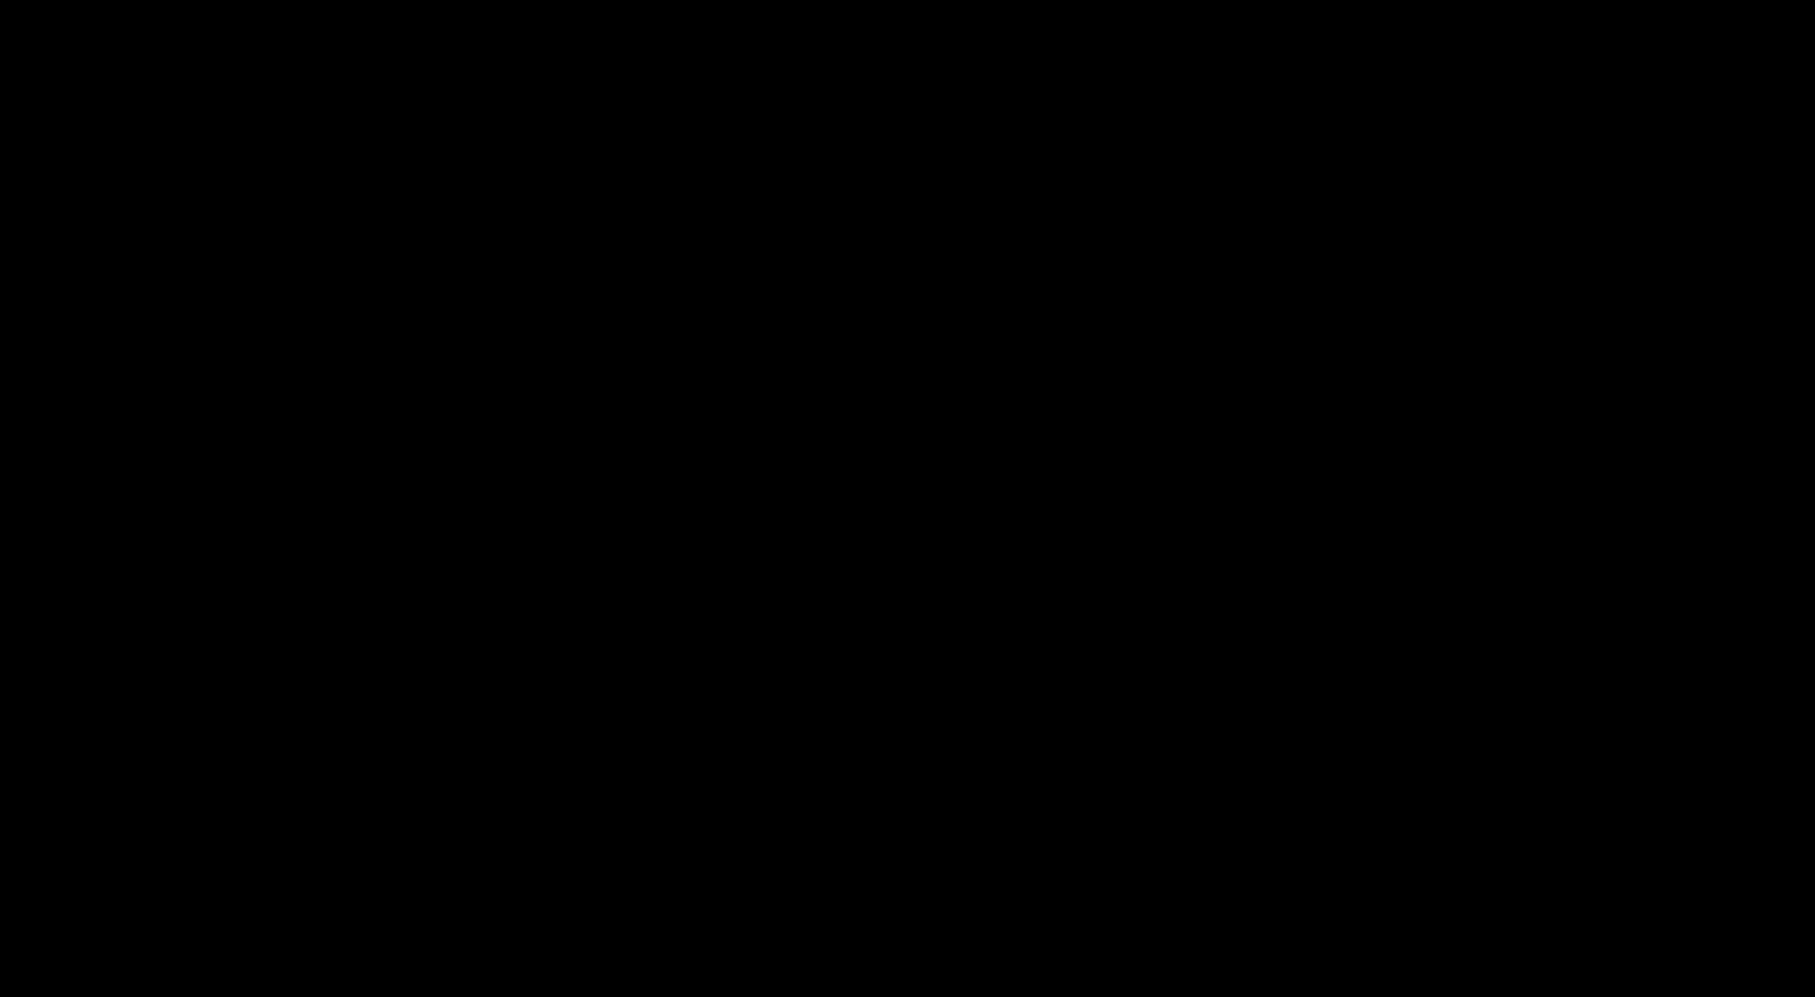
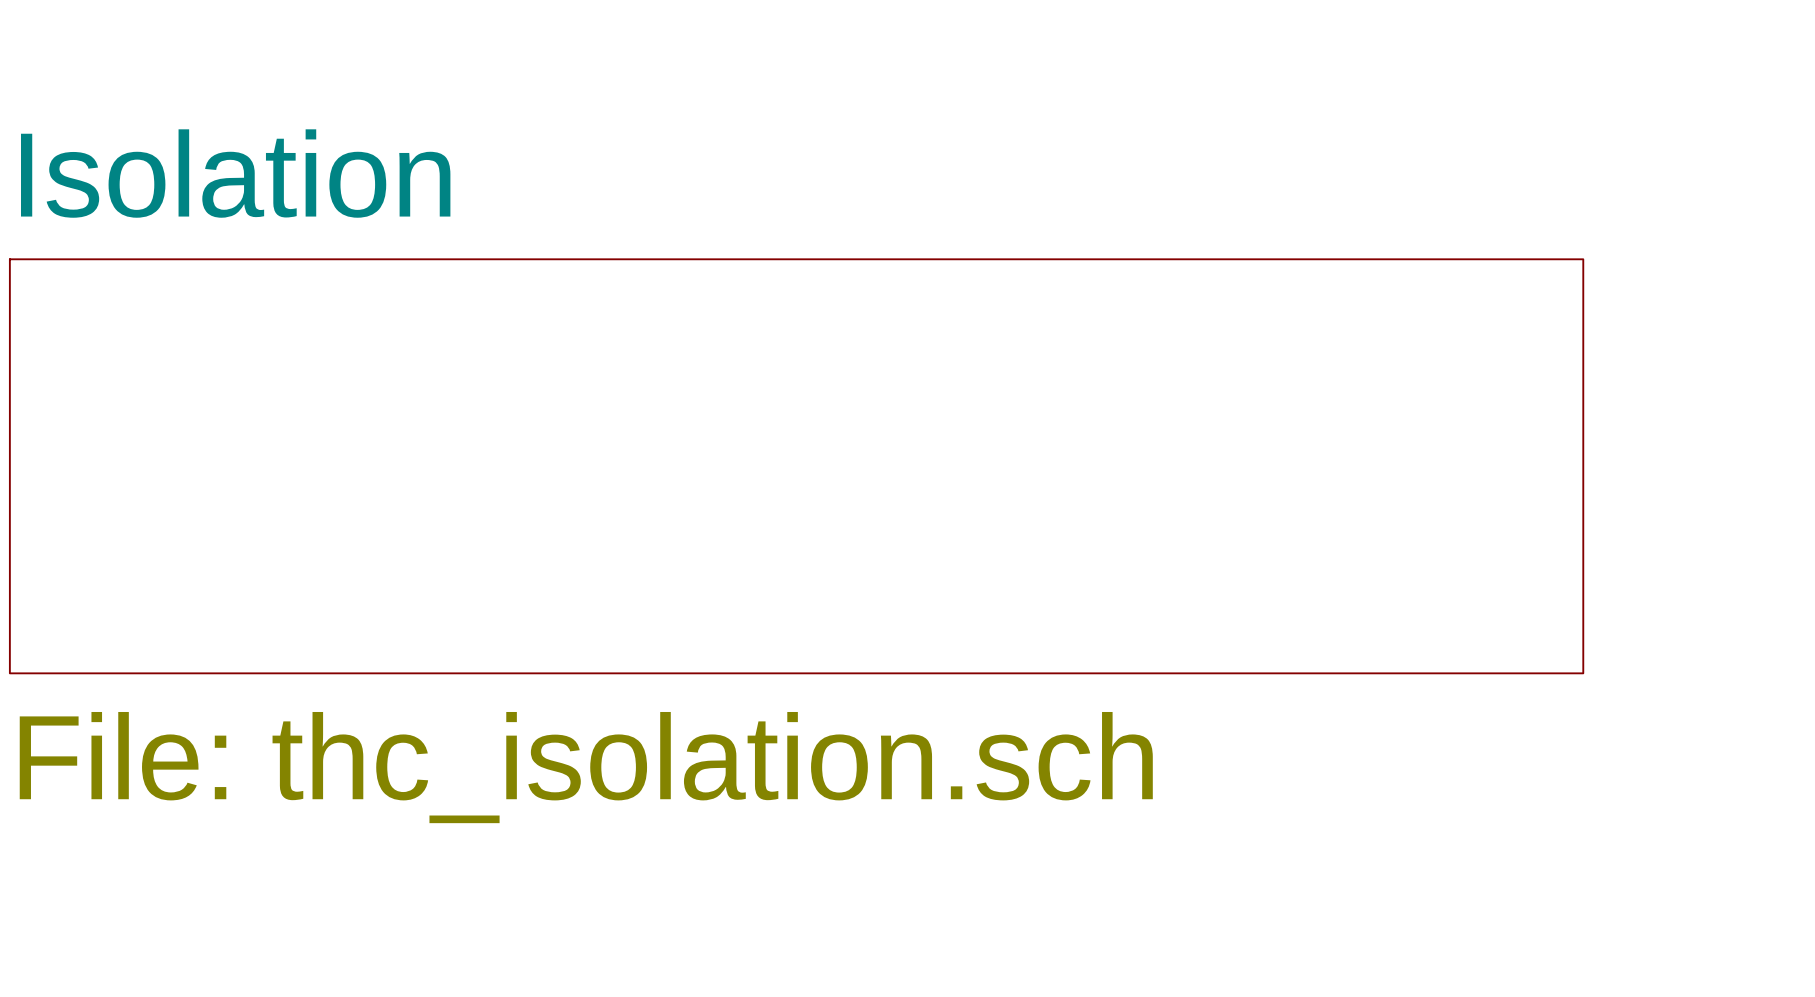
sheet Isolation: none -> File: thc_isolation.sch (796, 466)

